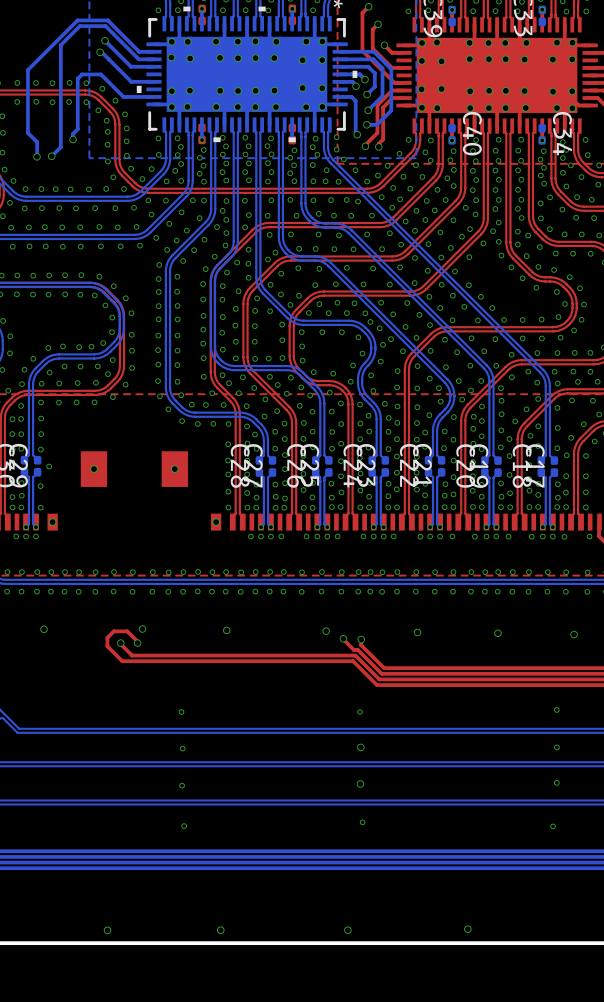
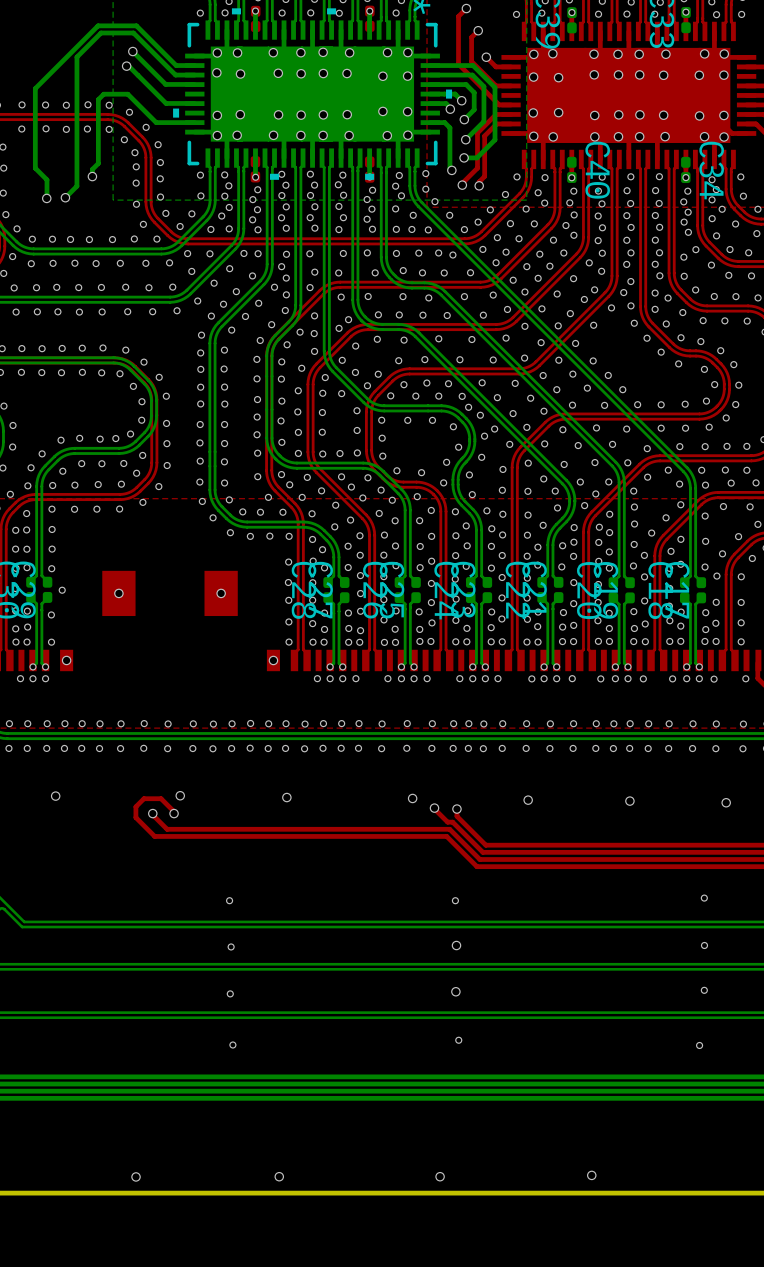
via: none -> (573, 542)

